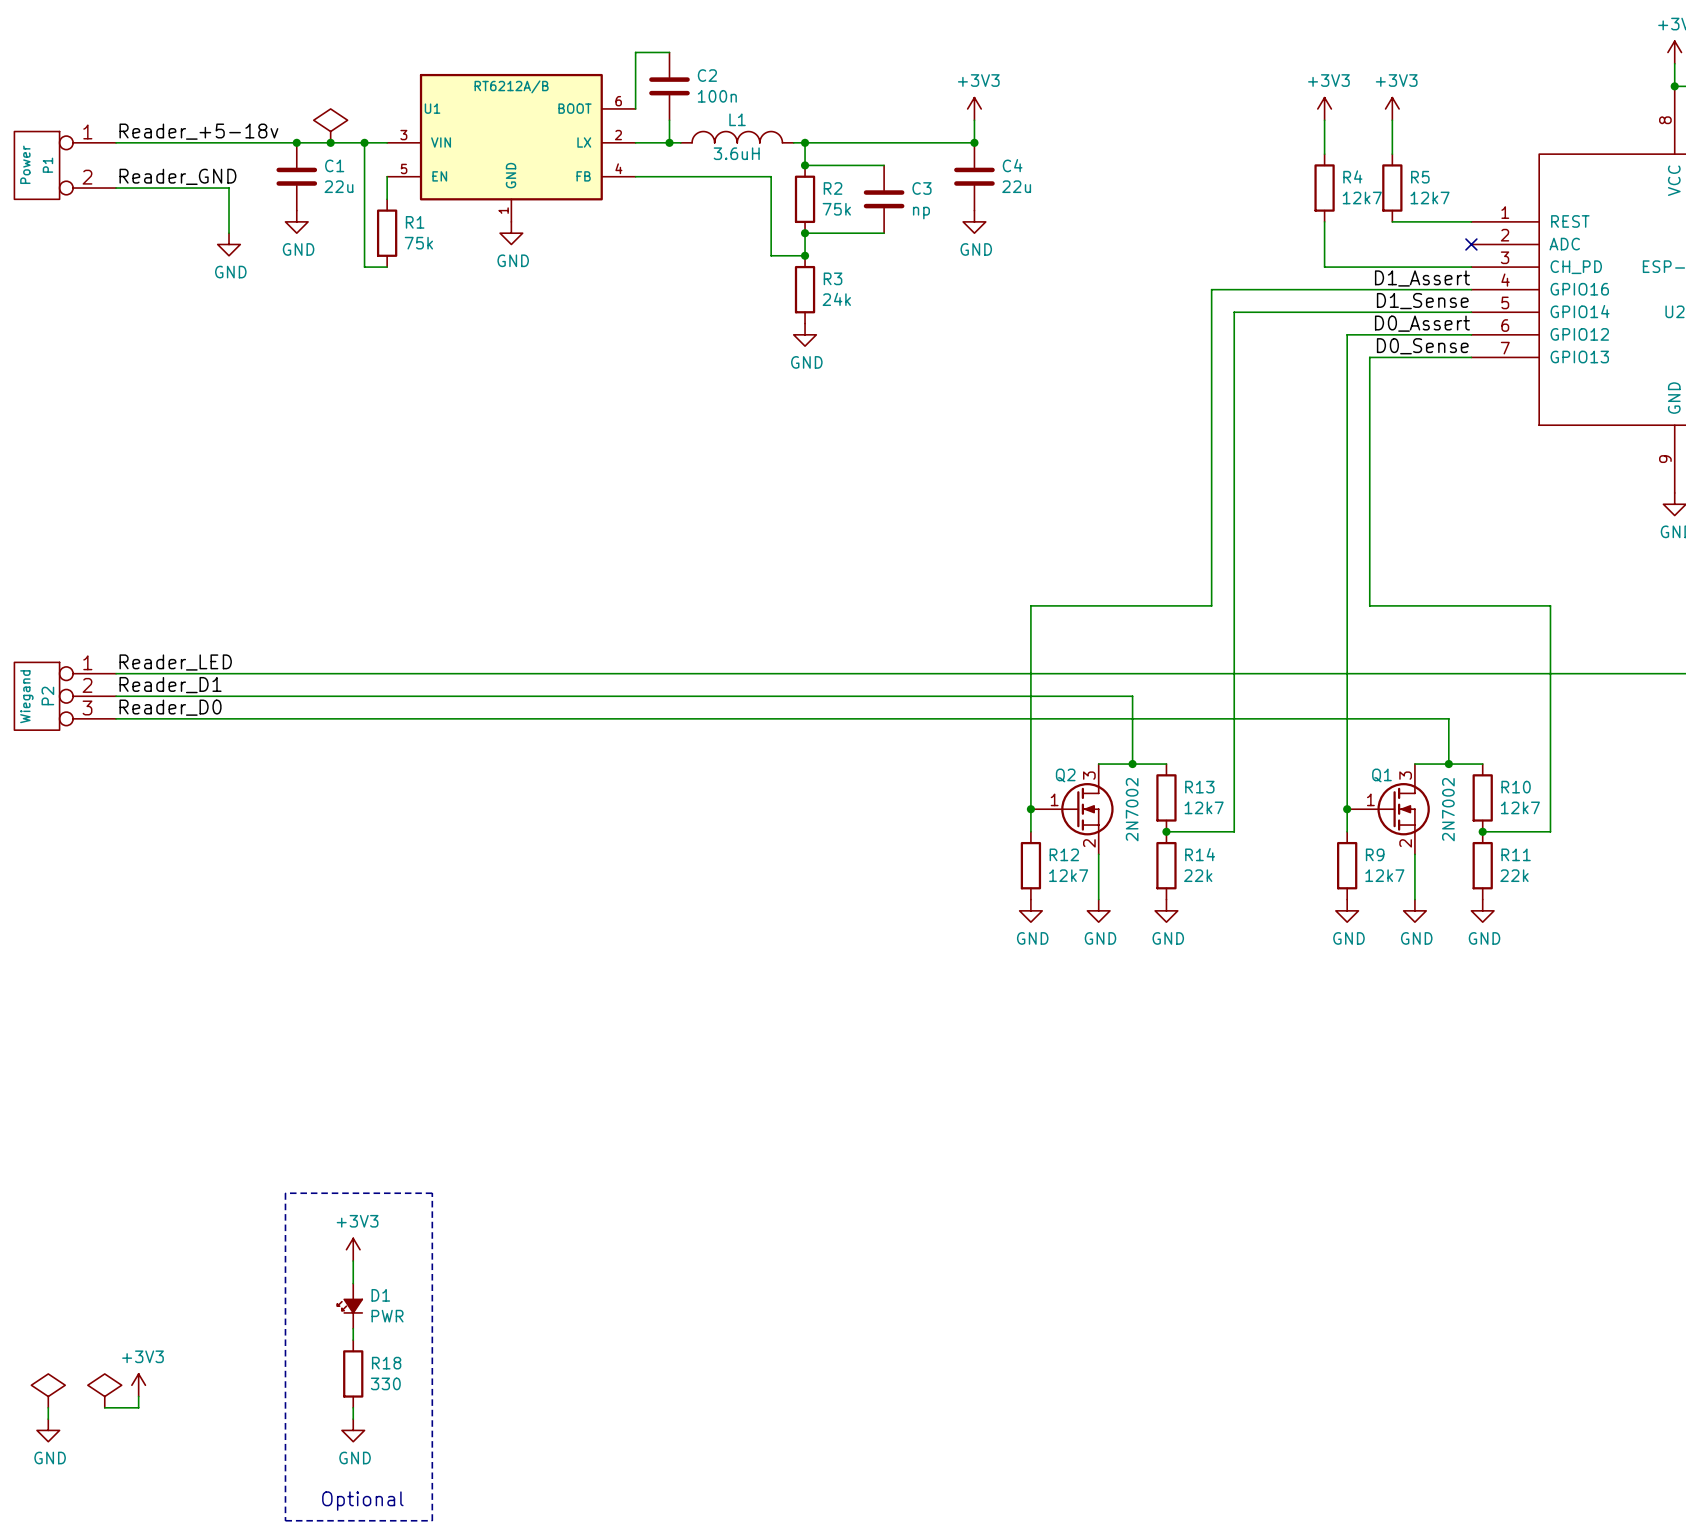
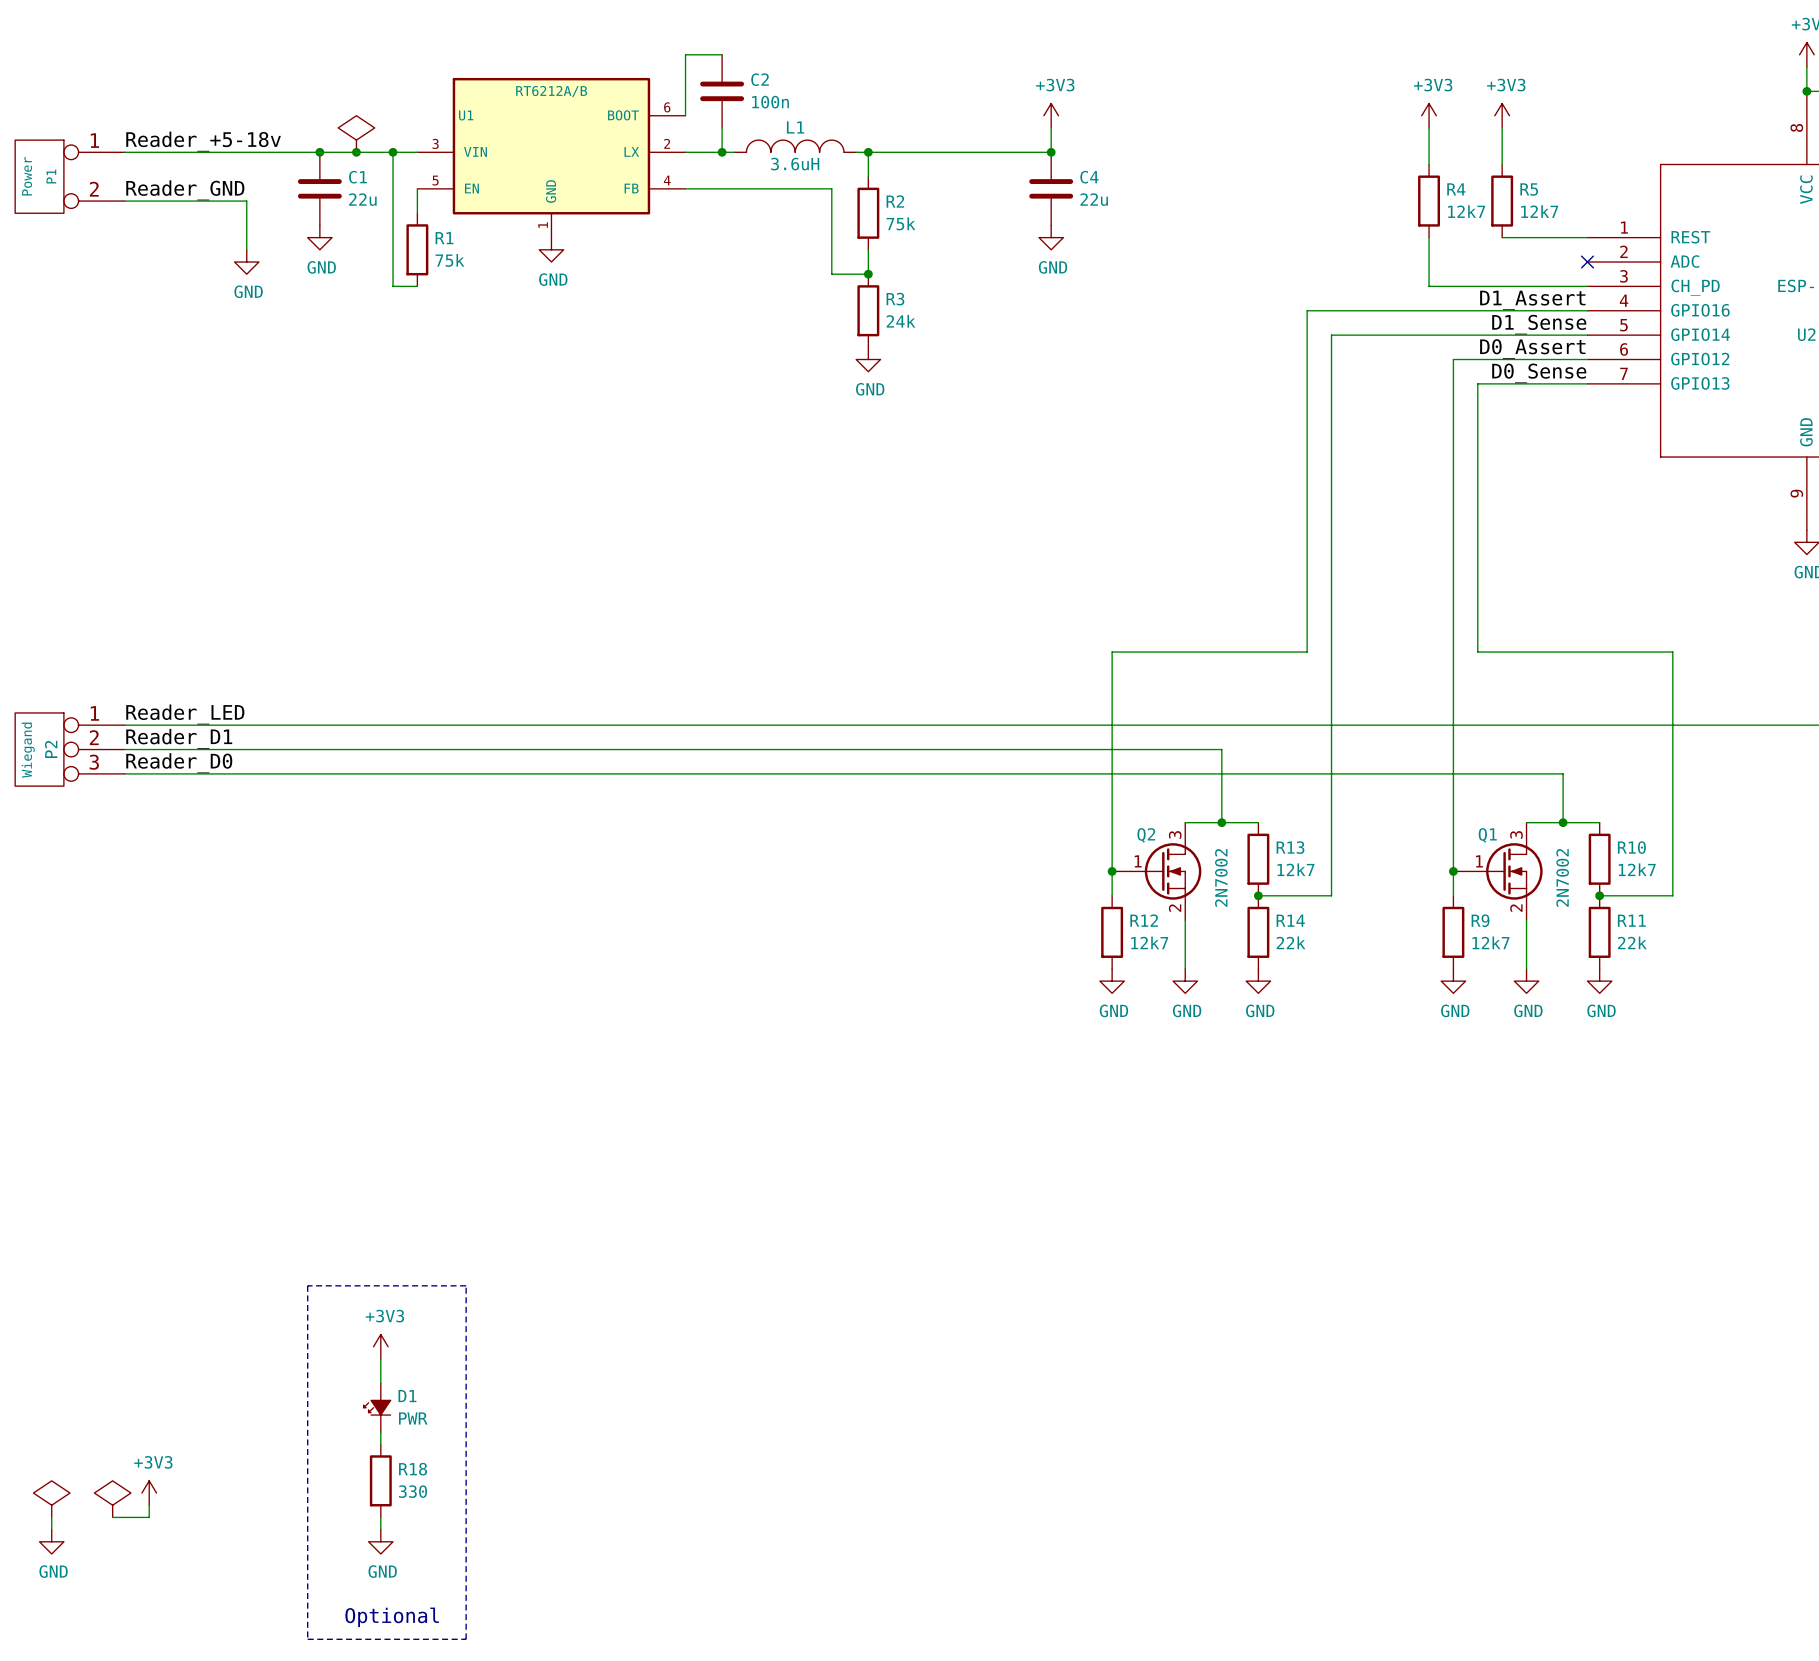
wire: (805, 165) (884, 165) -> none
junction: (805, 165) -> none
C3: np (884, 199) -> none
wire: (805, 233) (884, 233) -> none
junction: (805, 233) -> none

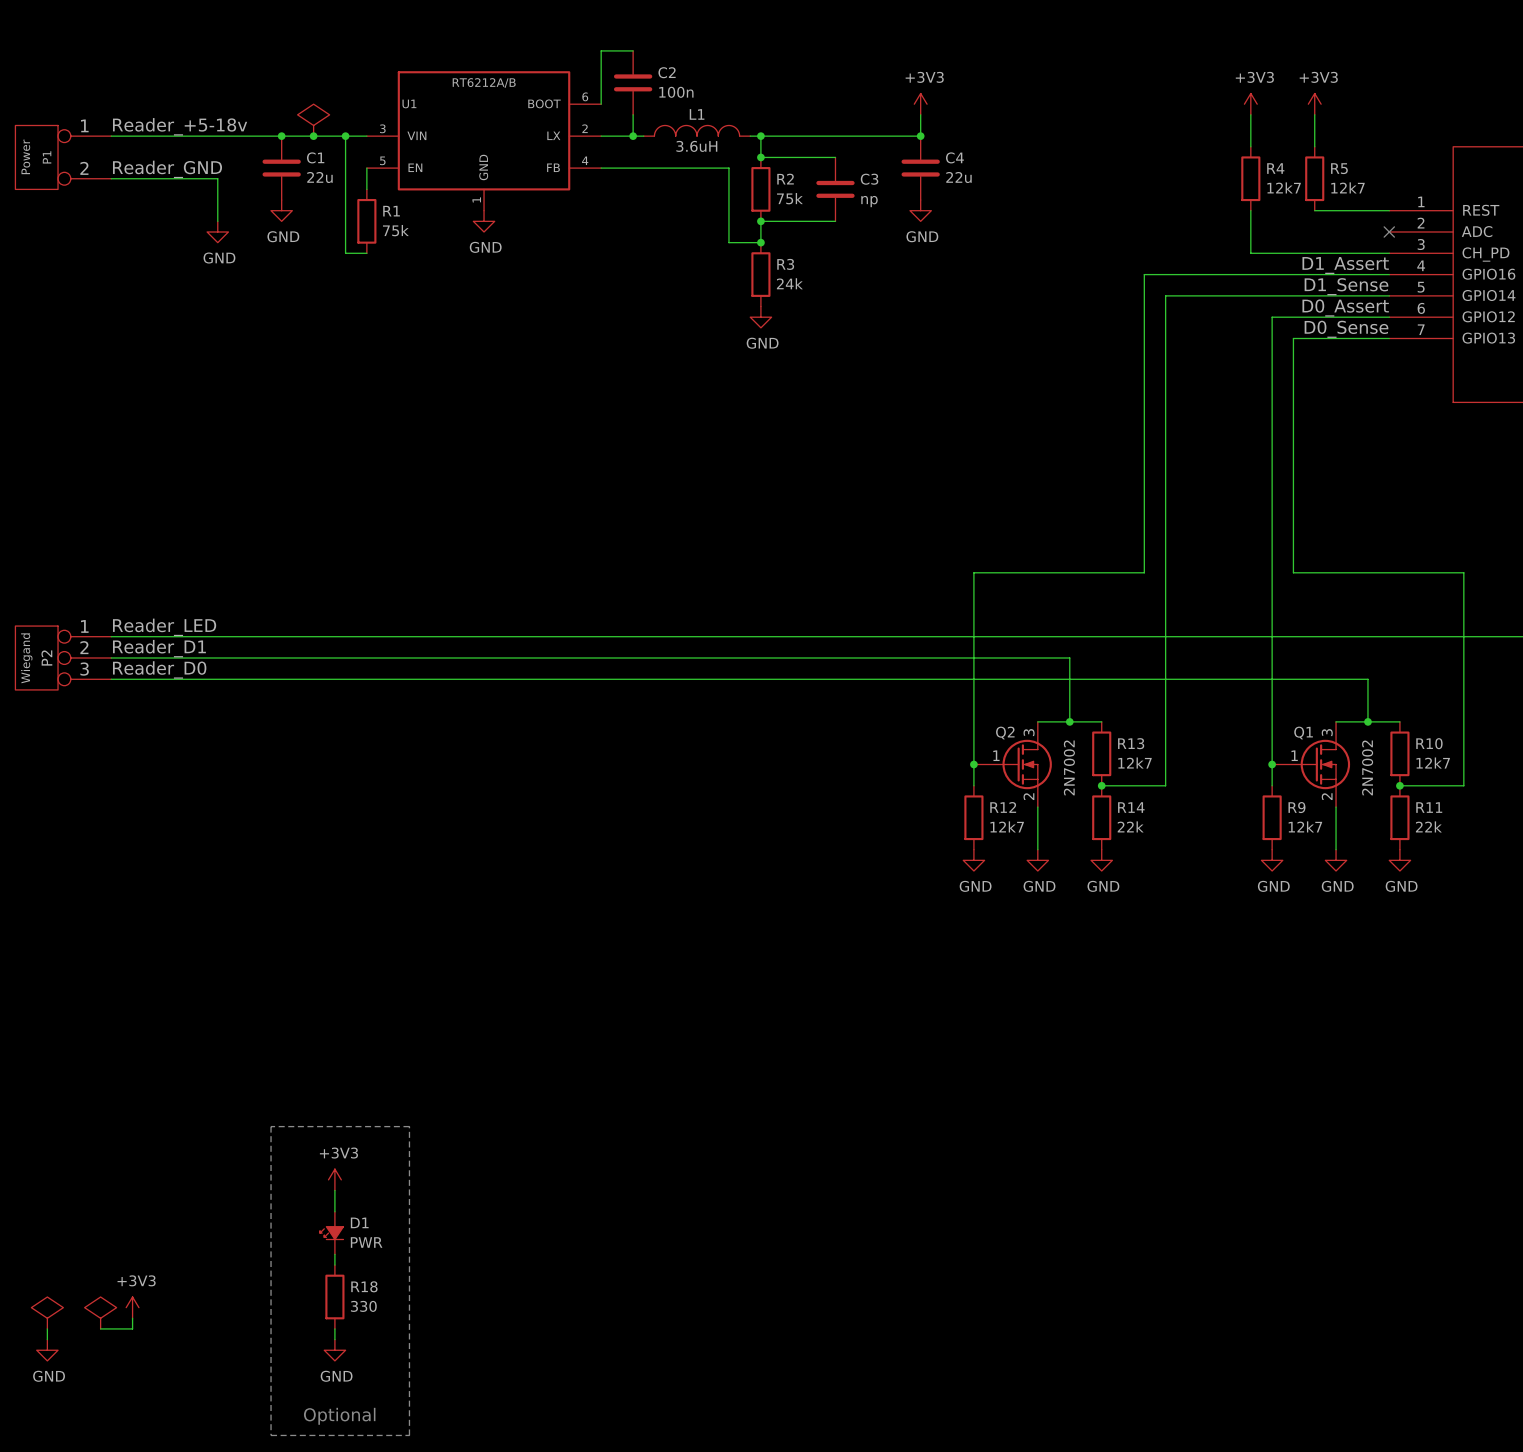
wire: none -> (760, 157) (835, 157)
junction: none -> (760, 157)
C3: none -> np (835, 189)
wire: none -> (760, 221) (835, 221)
junction: none -> (760, 221)

